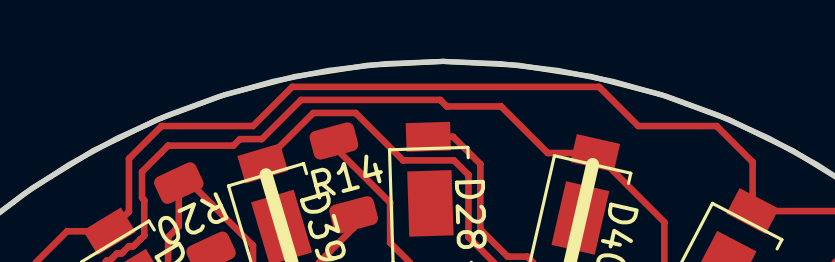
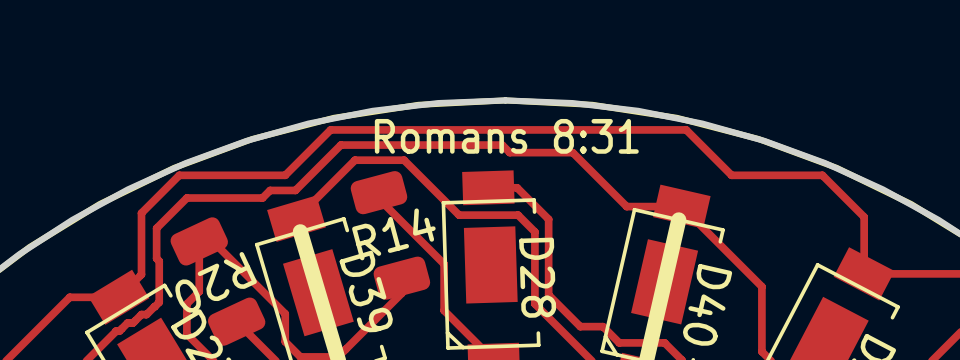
text: none -> Romans 8:31 (506, 136)

